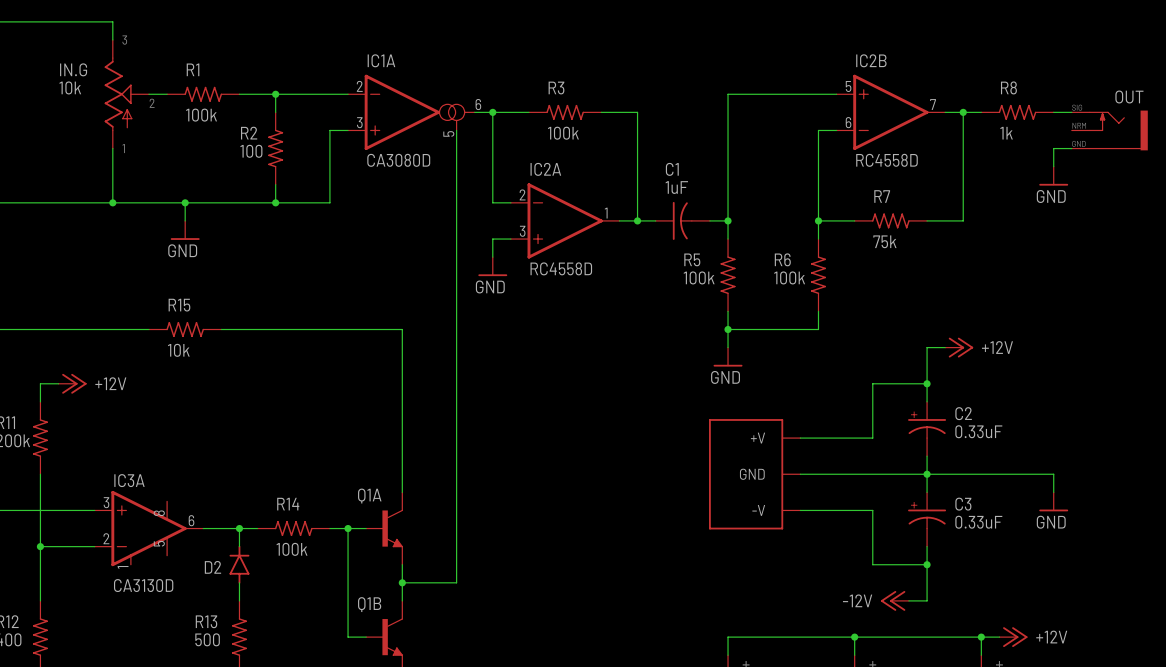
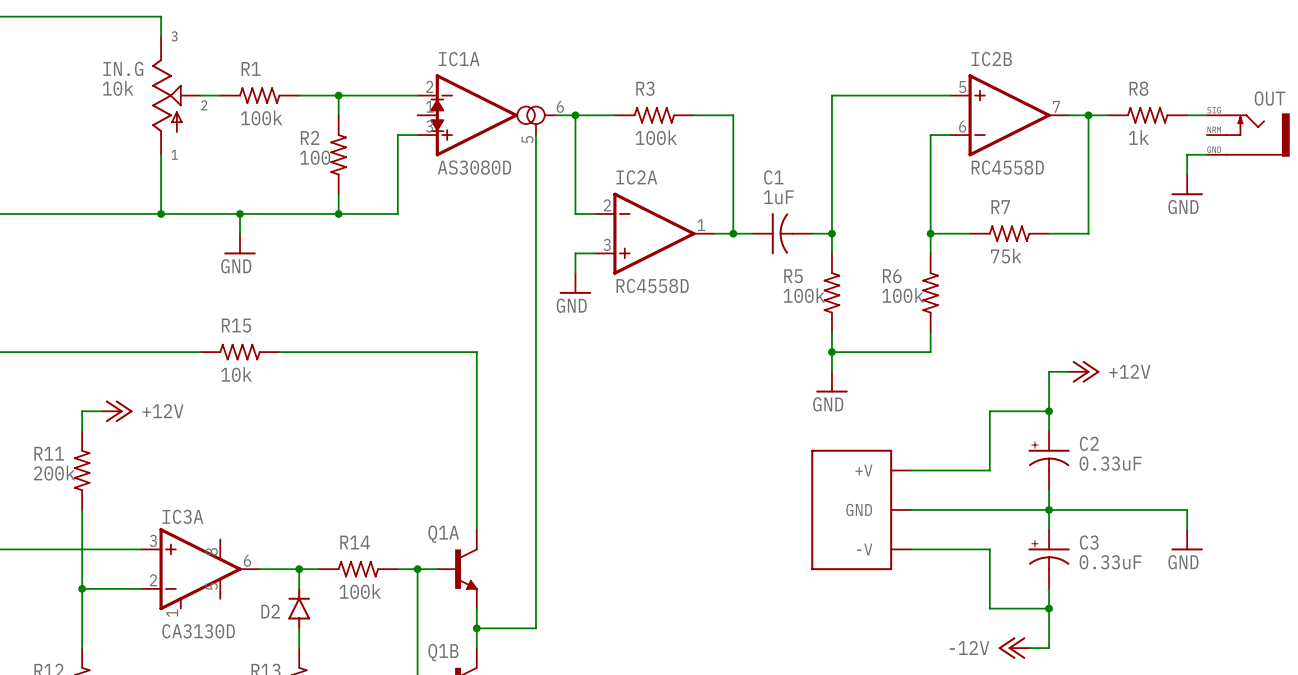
IC1A symbol: [348, 74, 476, 151] -> [417, 74, 557, 157]
IC1A value: CA3080D (398, 160) -> AS3080D (474, 167)

